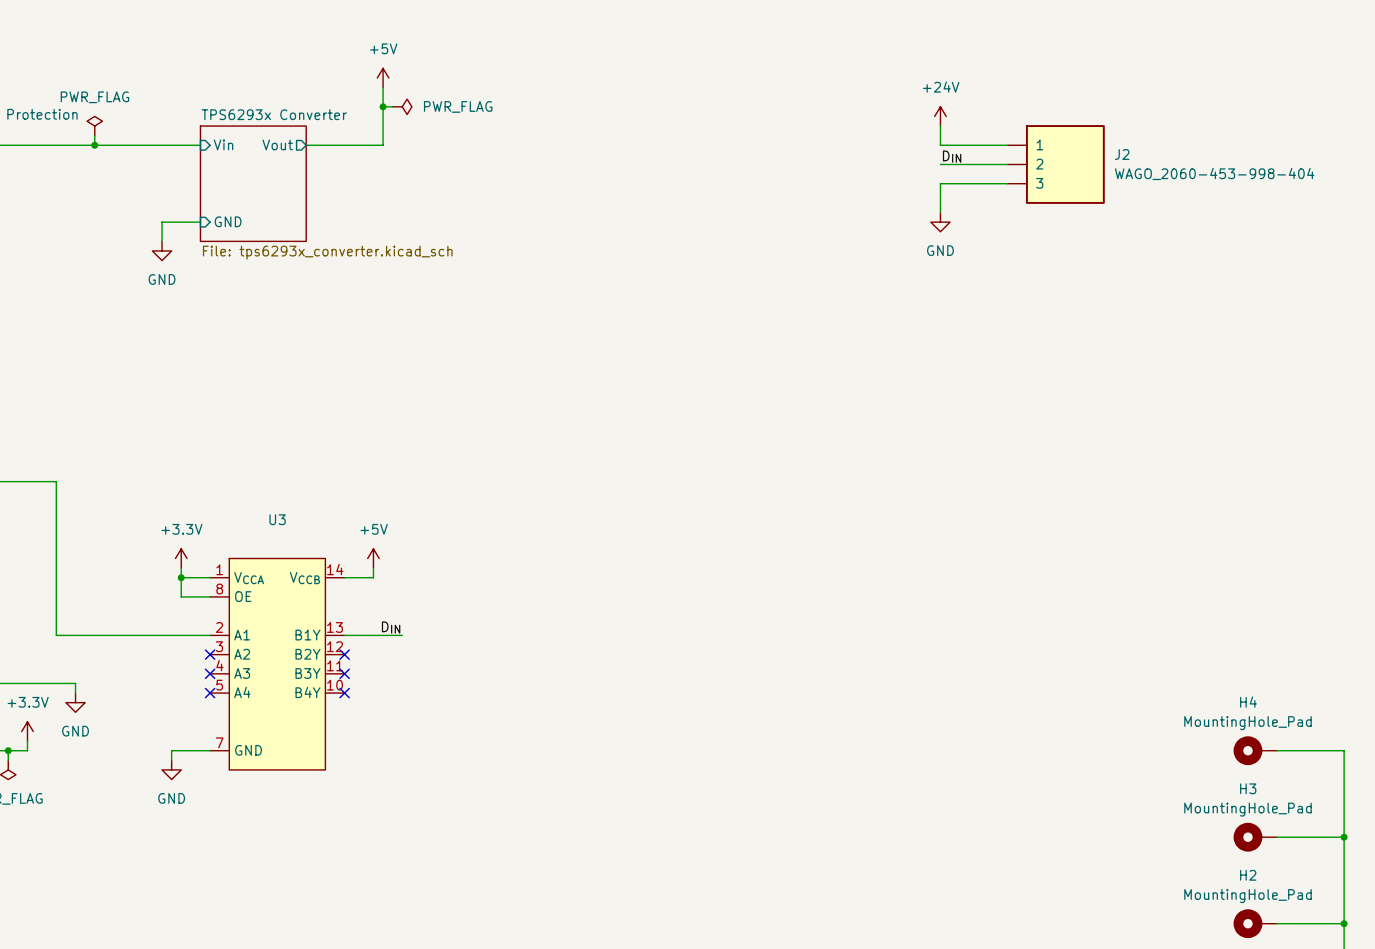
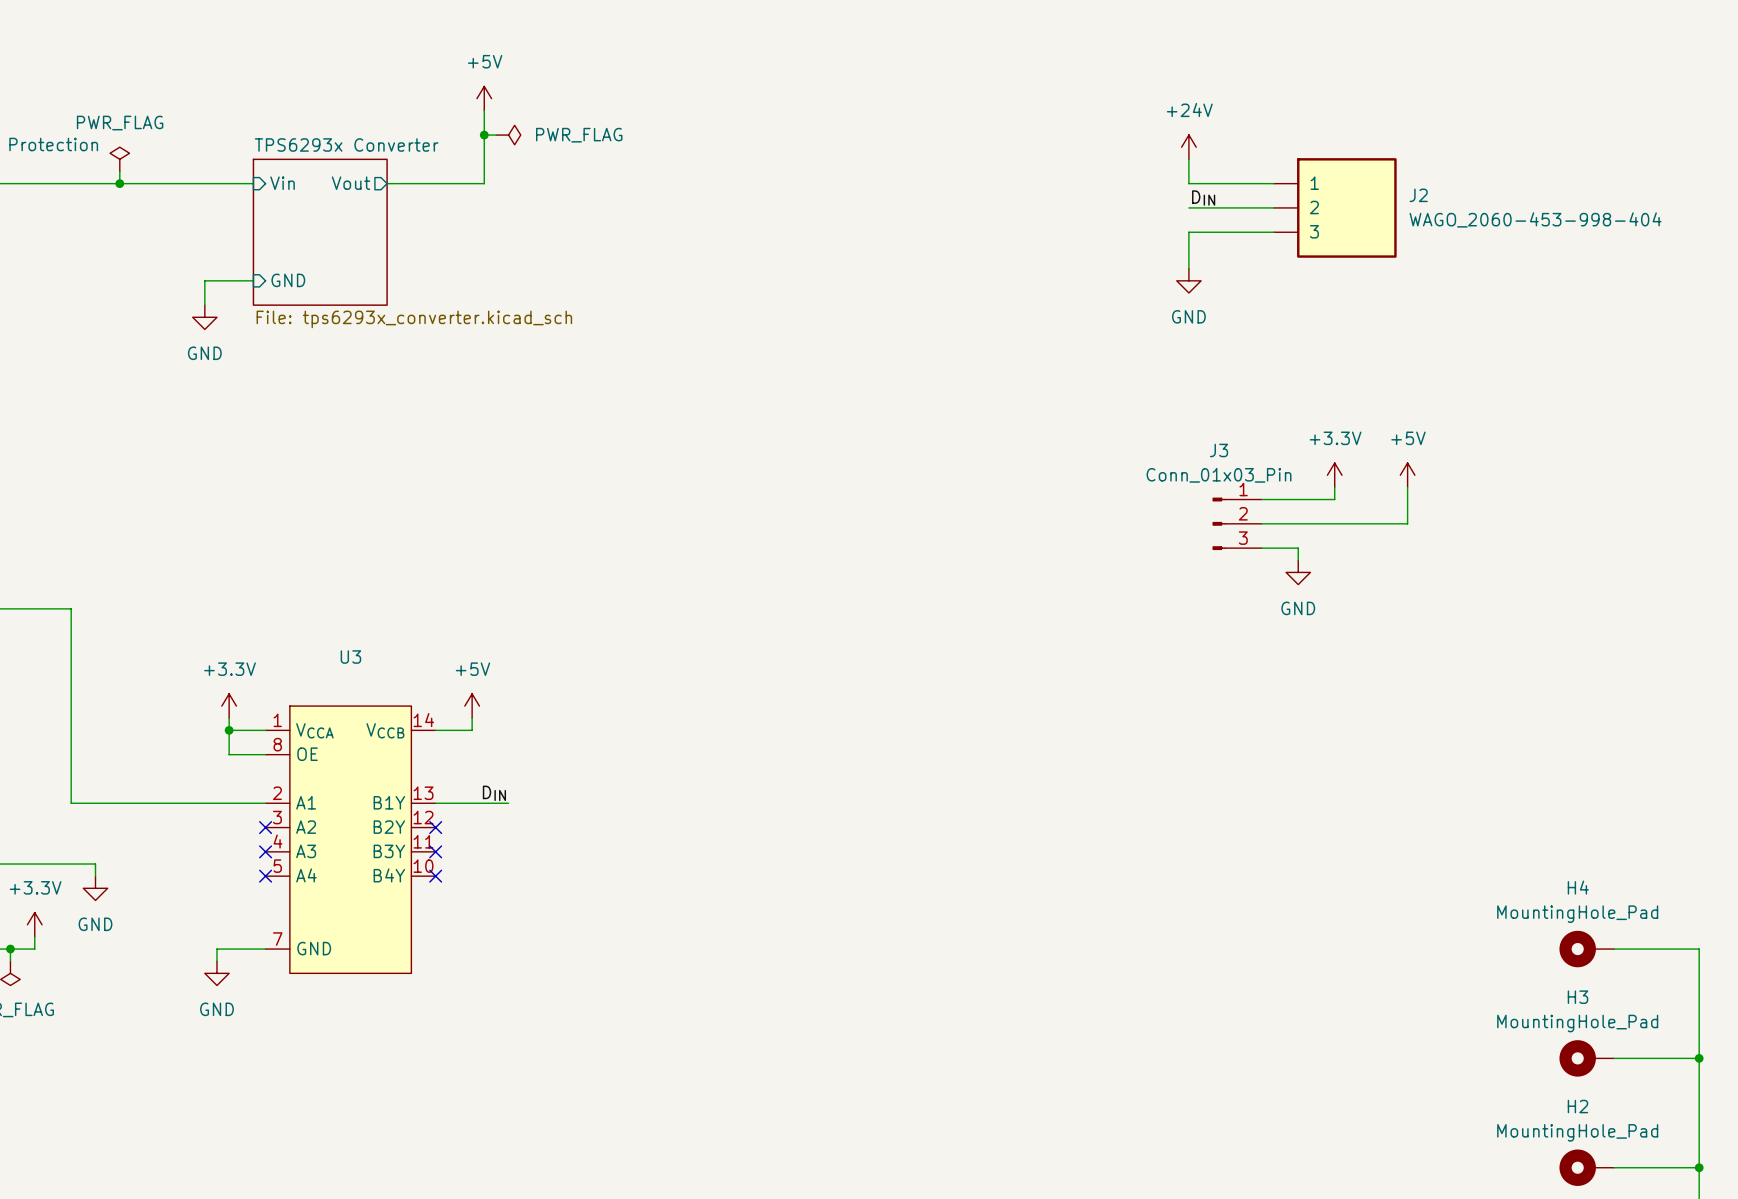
power symbol: none -> +3.3V (1334, 475)
power symbol: none -> +5V (1407, 475)
wire: none -> (1334, 487) (1334, 499) (1261, 499)
wire: none -> (1407, 487) (1407, 523) (1261, 523)
J3: none -> Conn_01x03_Pin (1237, 523)
wire: none -> (1261, 548) (1298, 548) (1298, 560)
power symbol: none -> GND (1298, 572)

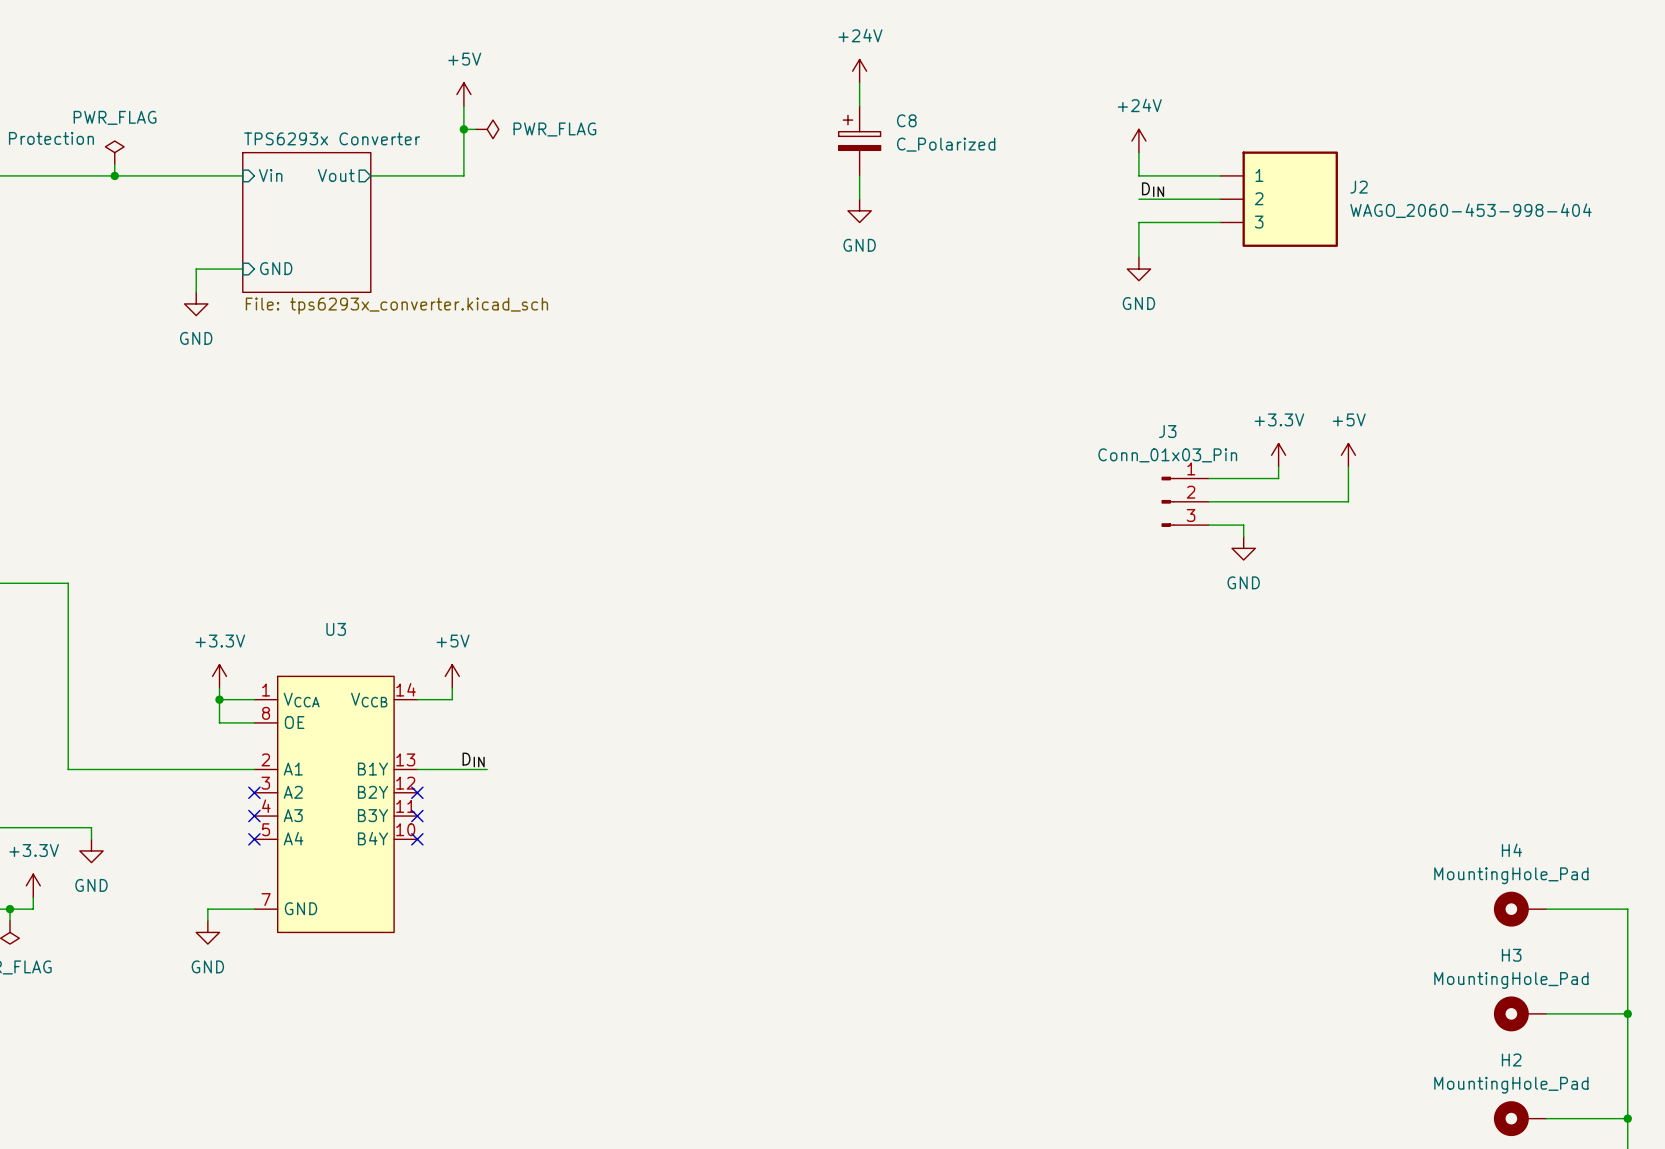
power symbol: none -> +24V (859, 71)
wire: none -> (859, 82) (859, 106)
C8: none -> C_Polarized (859, 141)
wire: none -> (859, 175) (859, 199)
power symbol: none -> GND (859, 210)

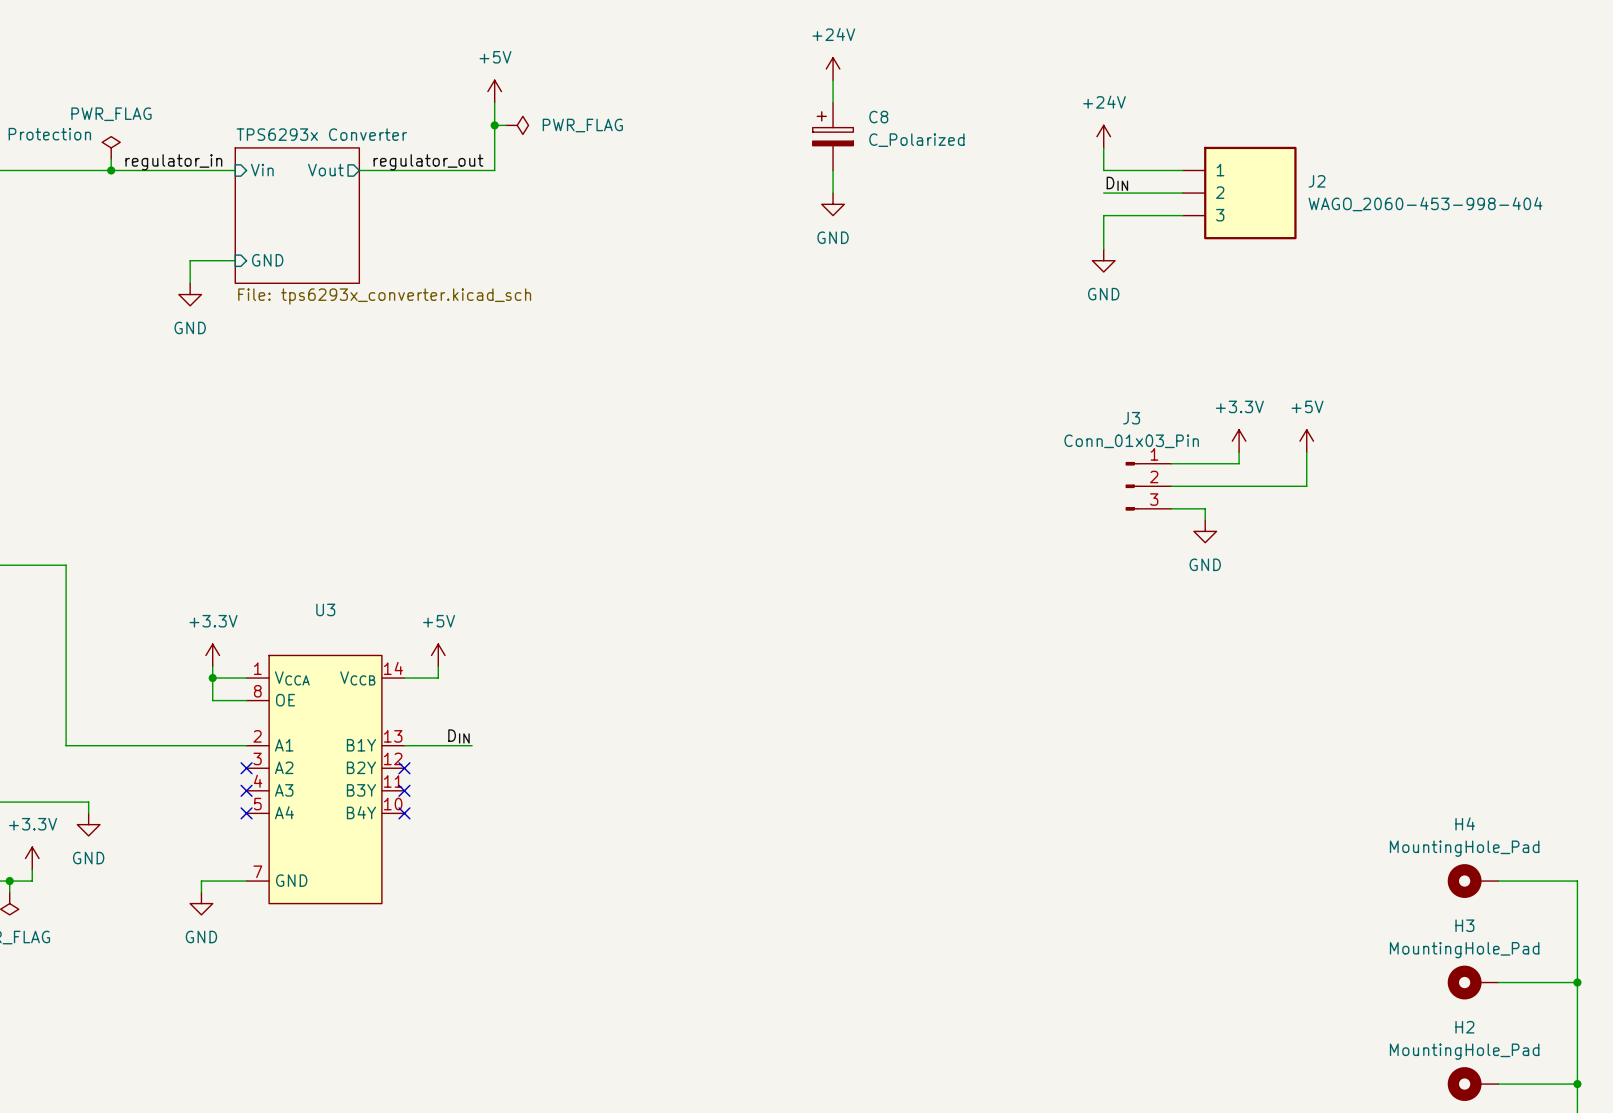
power symbol position: +5V (463, 94) -> +5V (494, 91)
wire: (463, 106) (463, 175) -> (494, 102) (494, 170) (449, 170)
wire: (463, 129) (475, 129) -> (494, 125) (505, 125)
junction position: (463, 129) -> (494, 125)
power symbol position: PWR_FLAG (487, 129) -> PWR_FLAG (517, 125)
label: none -> regulator_in (173, 162)
label: none -> regulator_out (428, 162)

